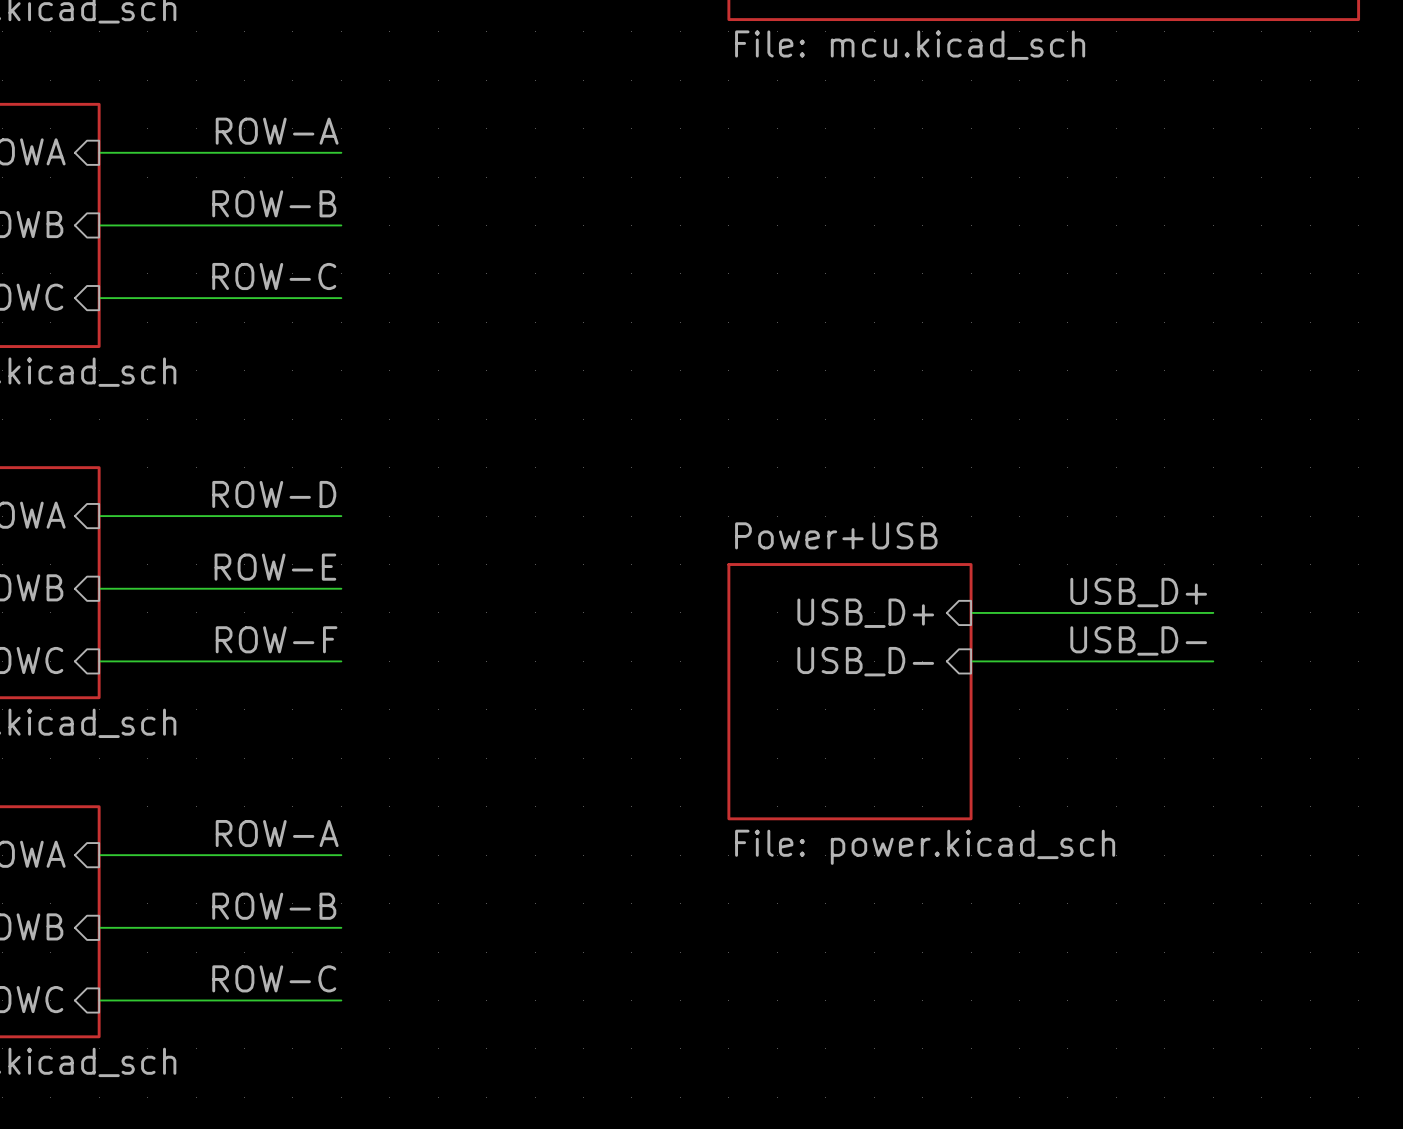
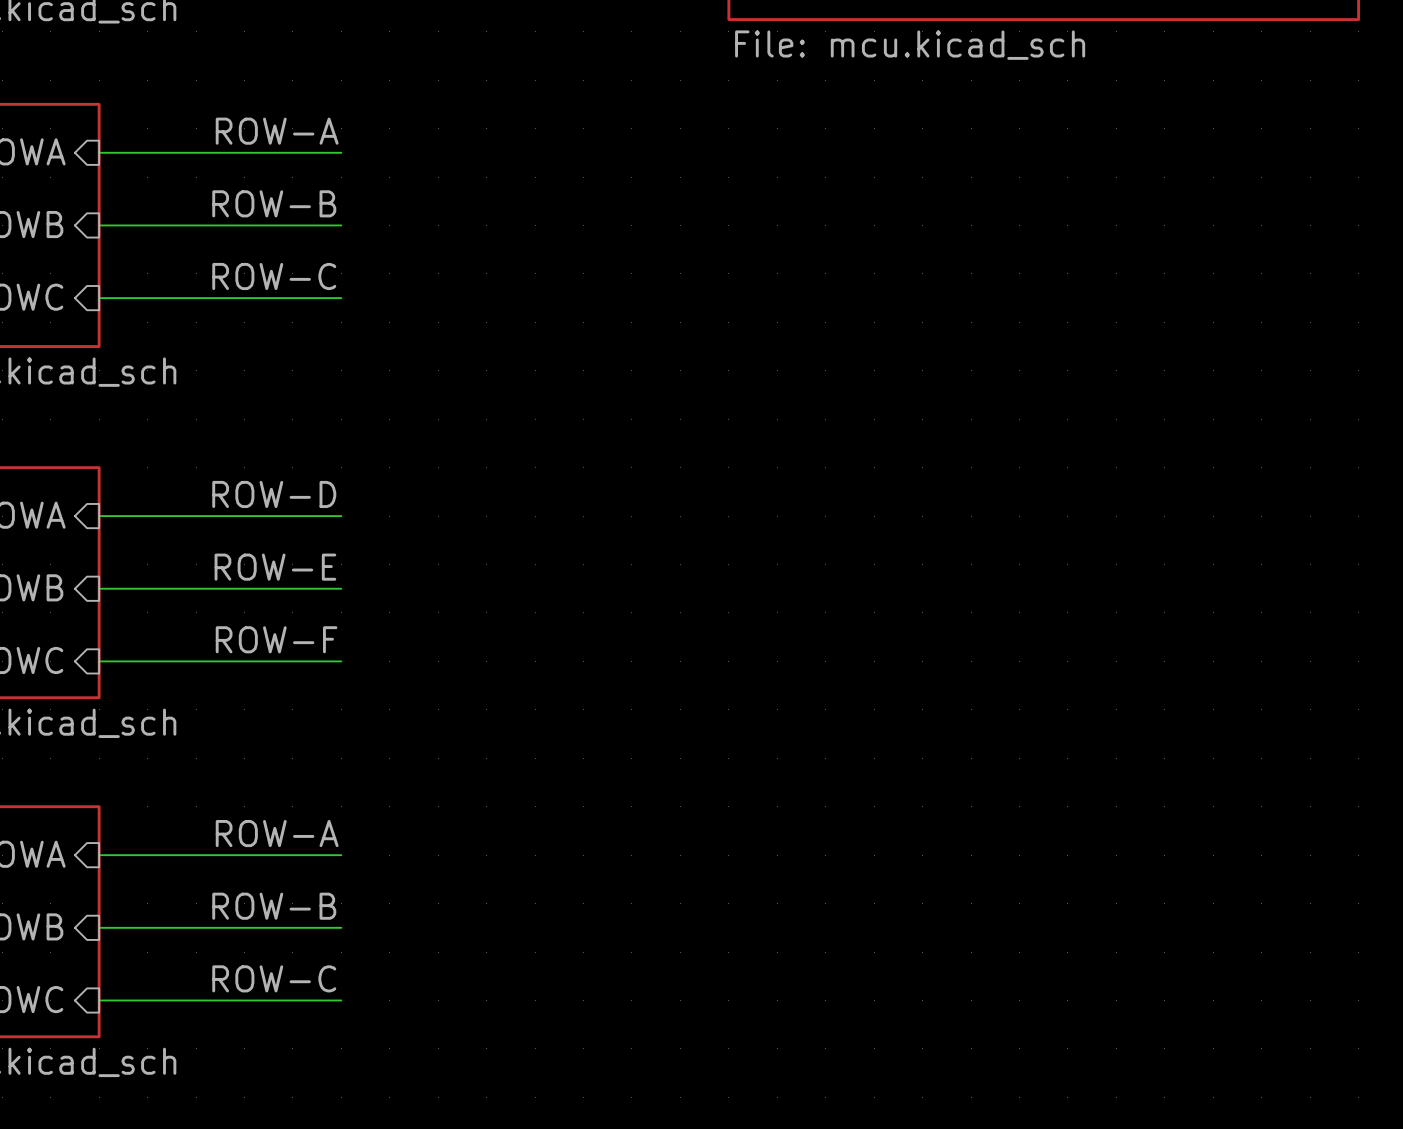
label: USB_D+ (1138, 592) -> none
wire: (971, 612) (1213, 612) -> none
sheet pin: USB_D+ (865, 613) -> none
label: USB_D- (1138, 640) -> none
sheet pin: USB_D- (865, 661) -> none
wire: (971, 661) (1213, 661) -> none
sheet Power+USB: File: power.kicad_sch (849, 691) -> none

